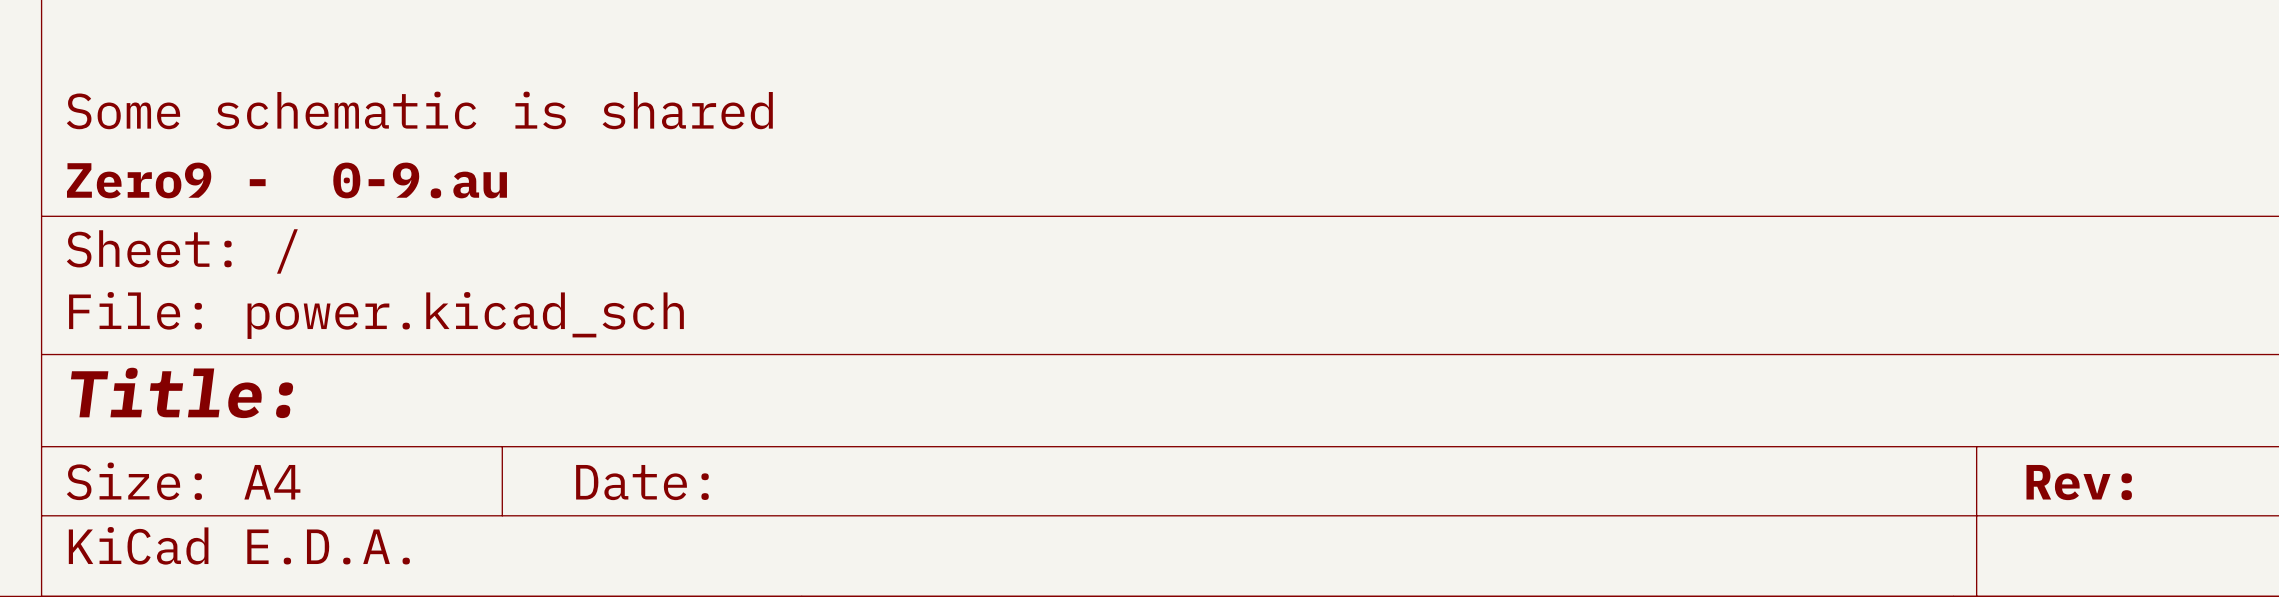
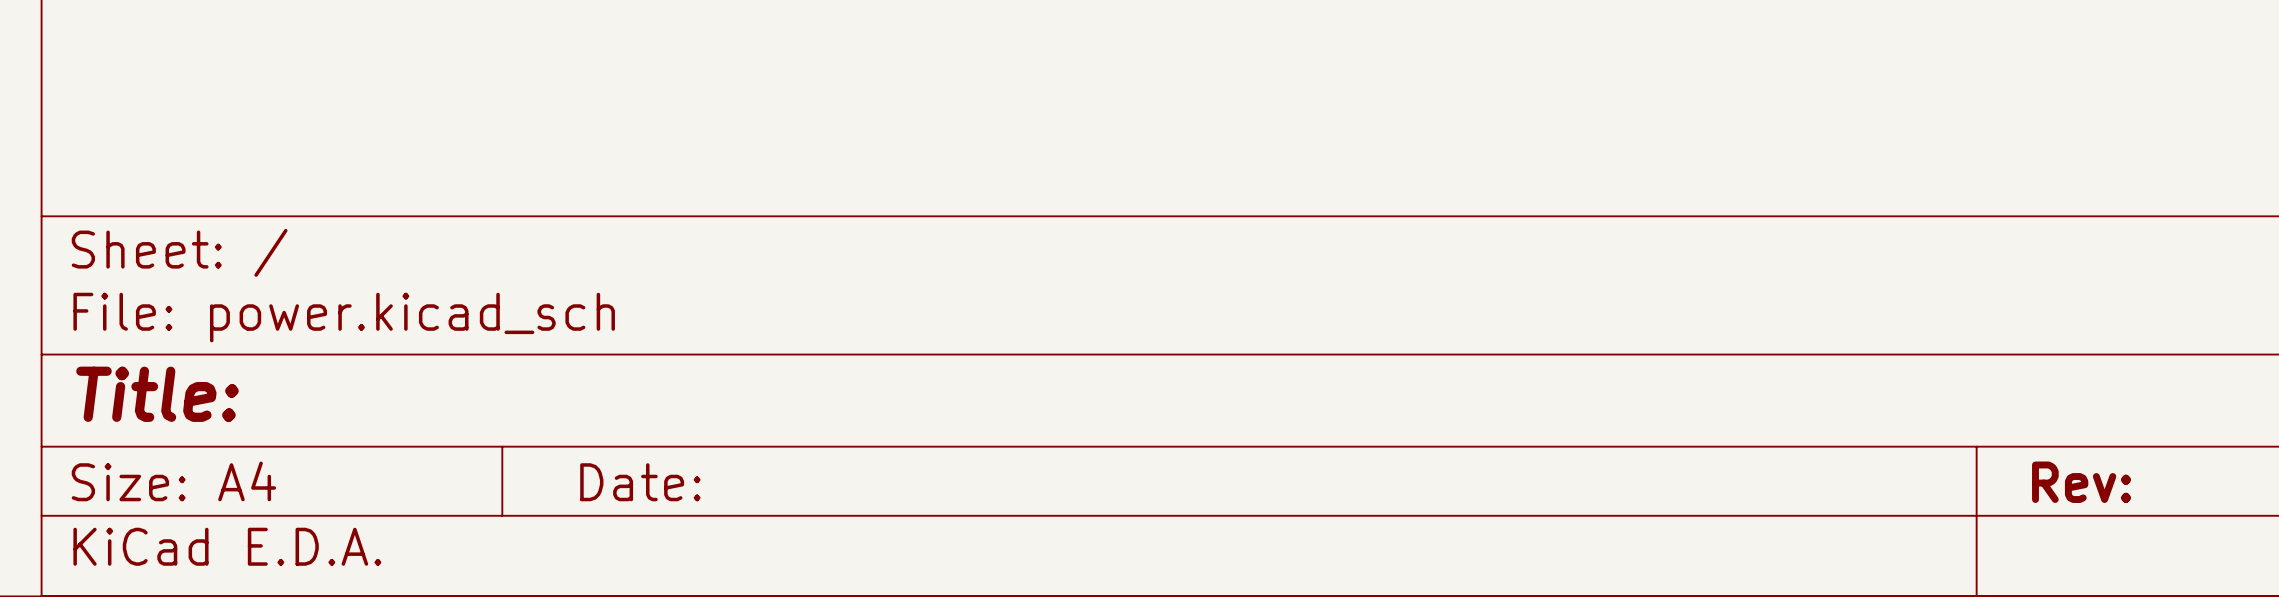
title block: Some schematic is shared (419, 110) -> none
title block: Zero9 - 0-9.au (286, 180) -> none

